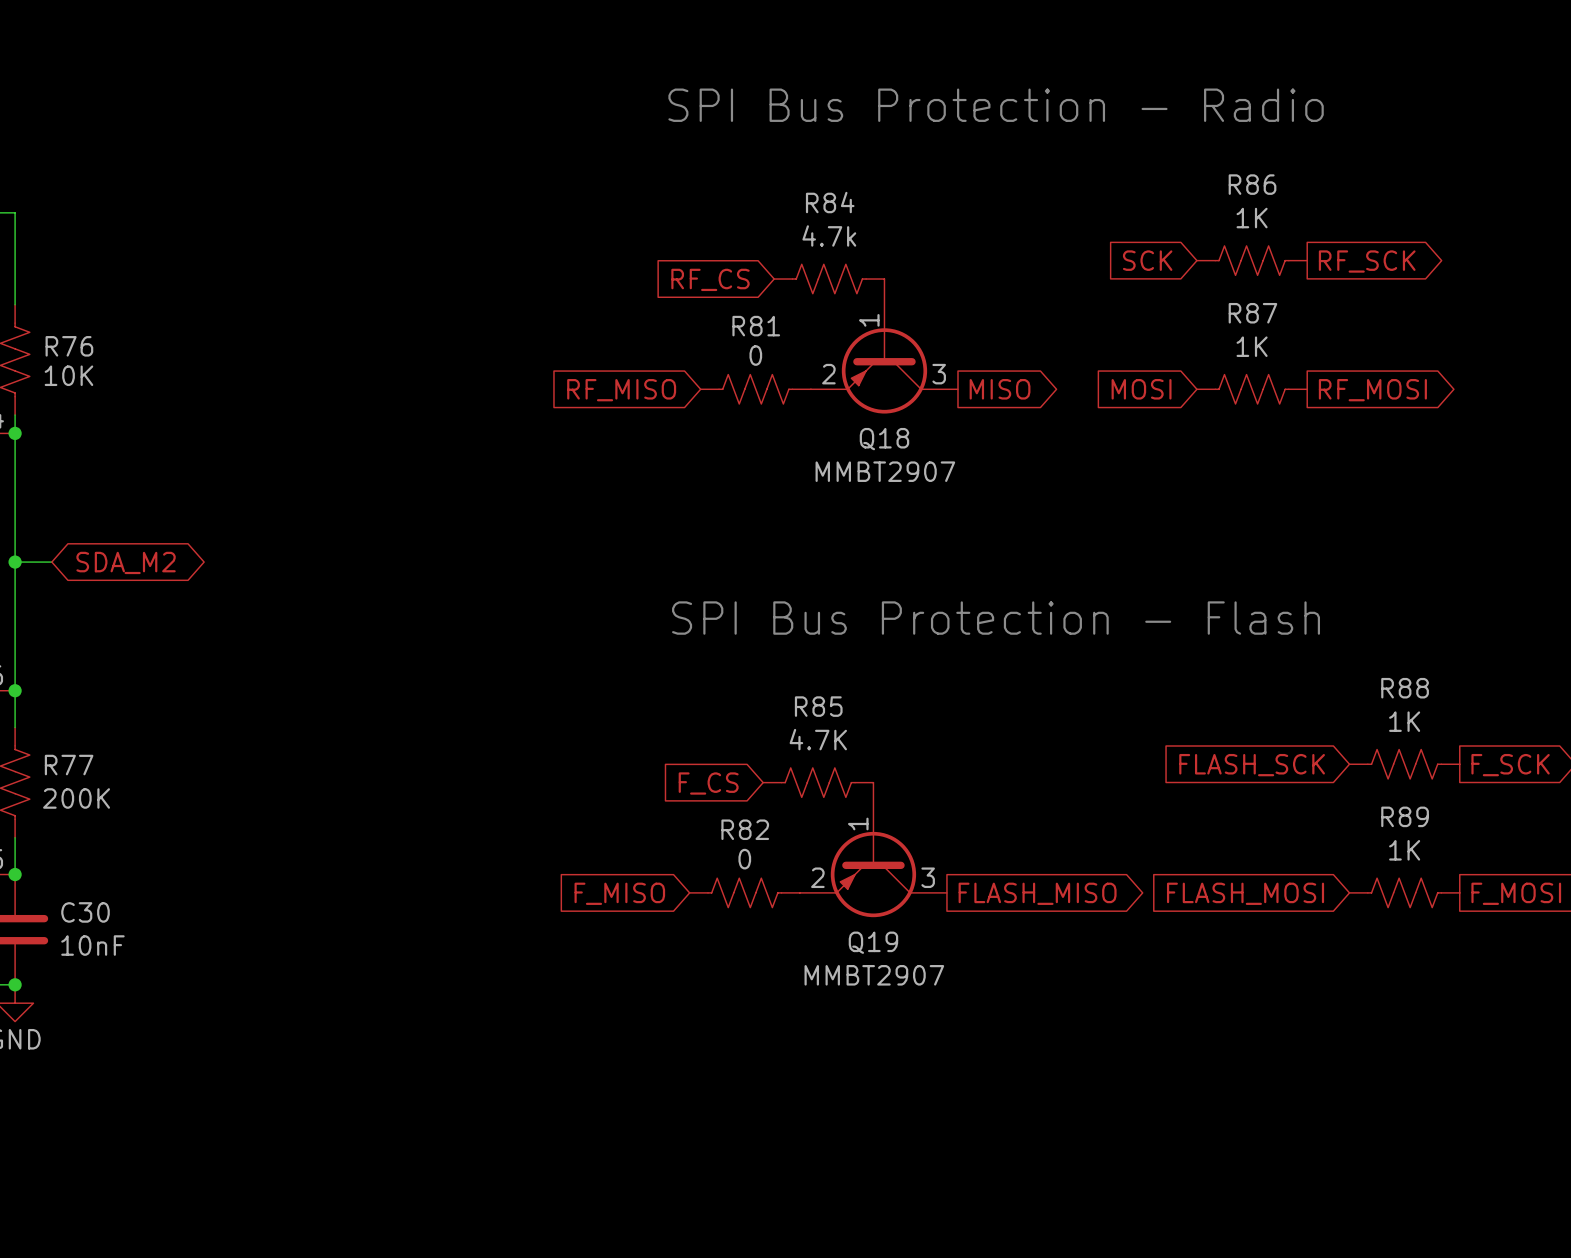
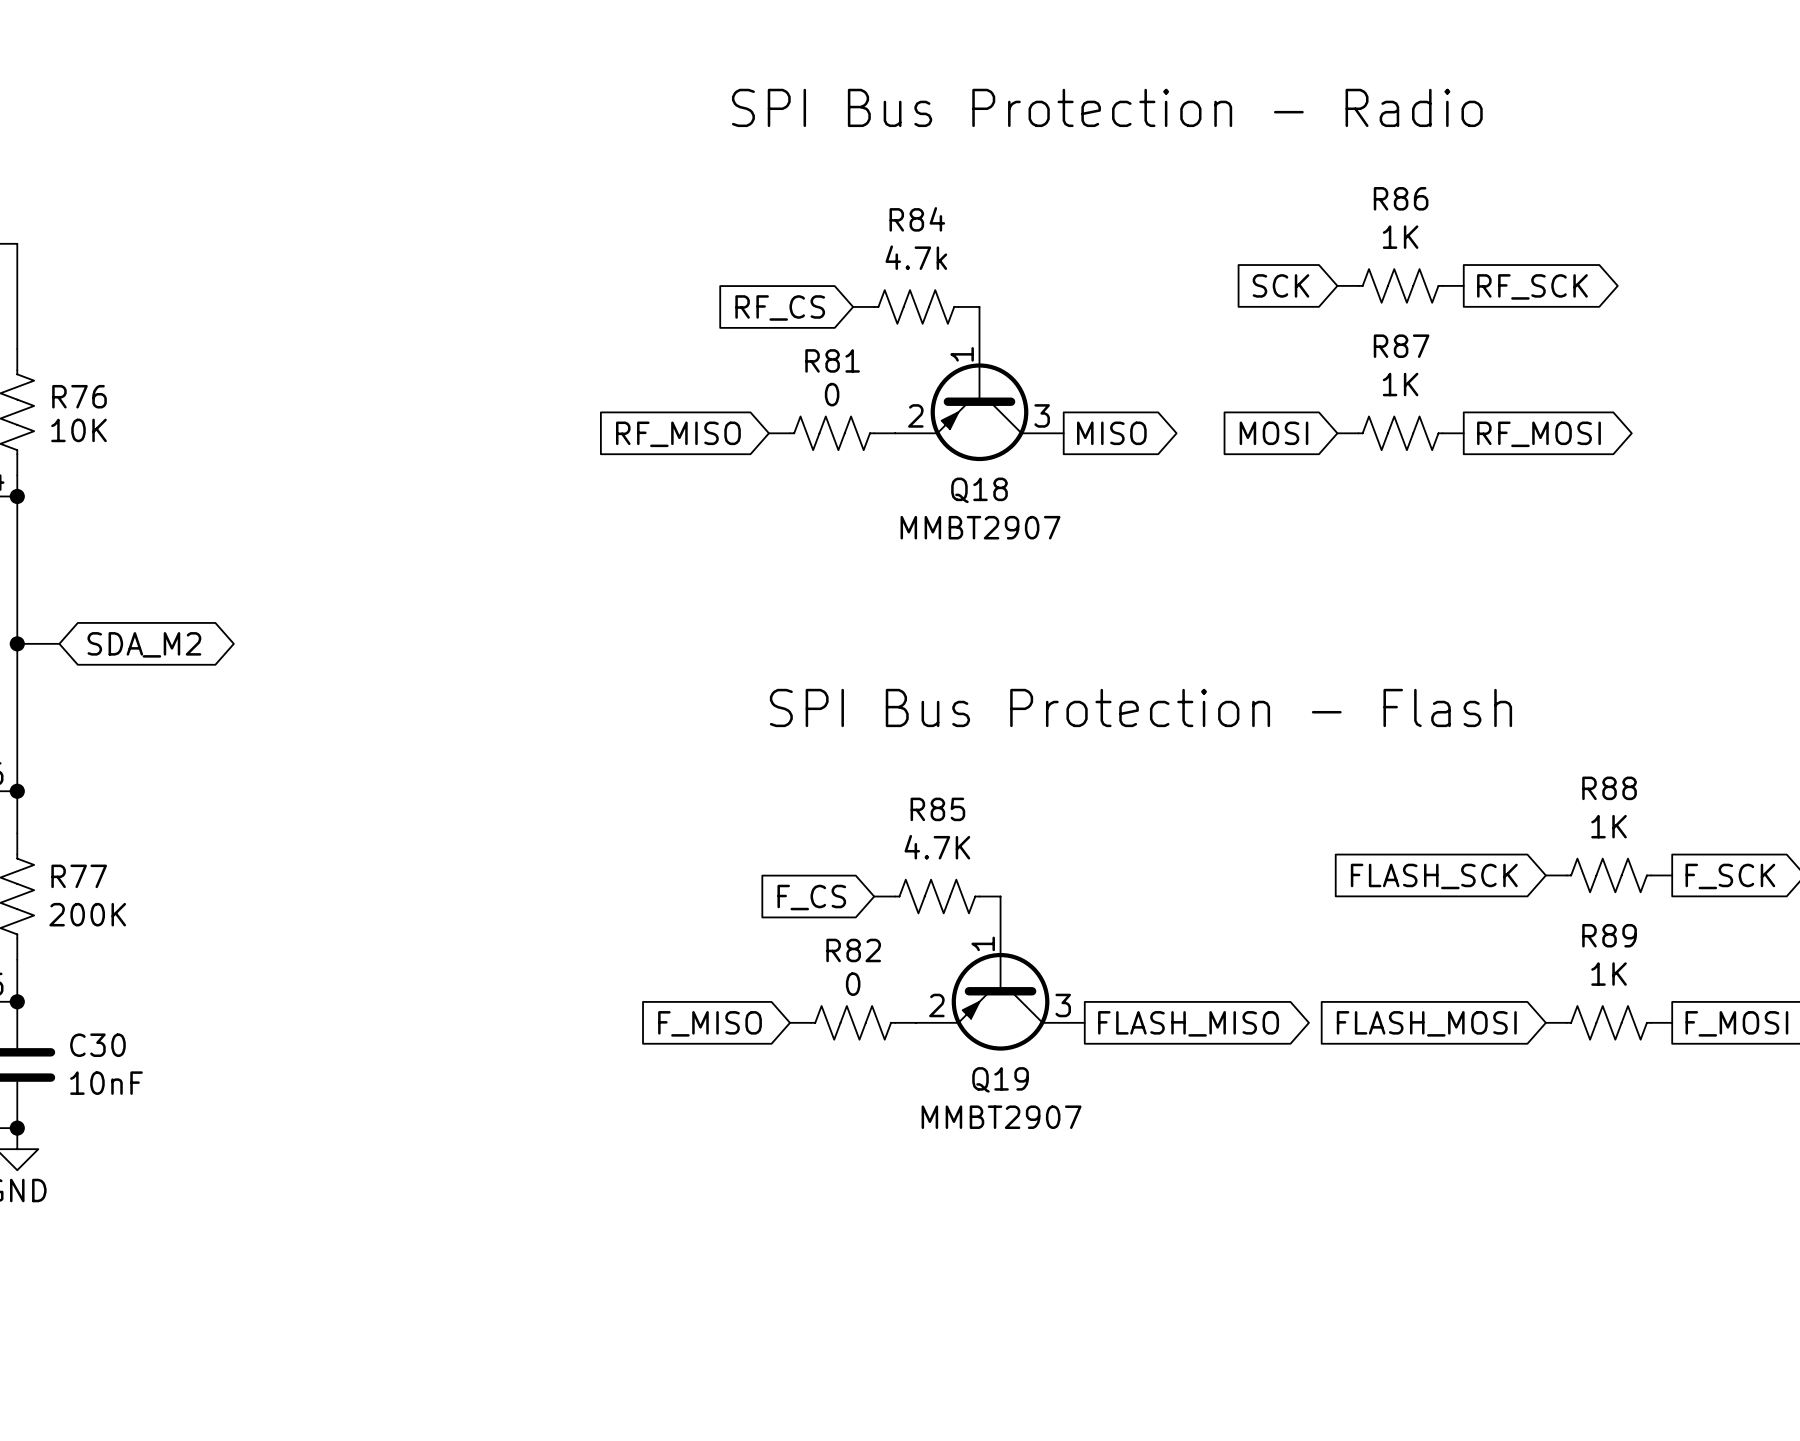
text position: SPI Bus Protection - Radio (996, 105) -> SPI Bus Protection - Radio (1107, 107)
global label position: SCK (1147, 260) -> SCK (1280, 285)
R86 position: (1252, 260) -> (1400, 285)
global label position: RF_SCK (1367, 261) -> RF_SCK (1532, 286)
global label position: RF_CS (710, 279) -> RF_CS (780, 307)
R84 position: (829, 279) -> (916, 306)
Q18 position: (884, 346) -> (979, 384)
R81 position: (755, 389) -> (832, 433)
global label position: MISO (1000, 389) -> MISO (1111, 433)
global label position: MOSI (1141, 389) -> MOSI (1273, 433)
R87 position: (1252, 389) -> (1400, 433)
global label position: RF_MISO (621, 390) -> RF_MISO (678, 434)
global label position: RF_MOSI (1372, 390) -> RF_MOSI (1538, 434)

